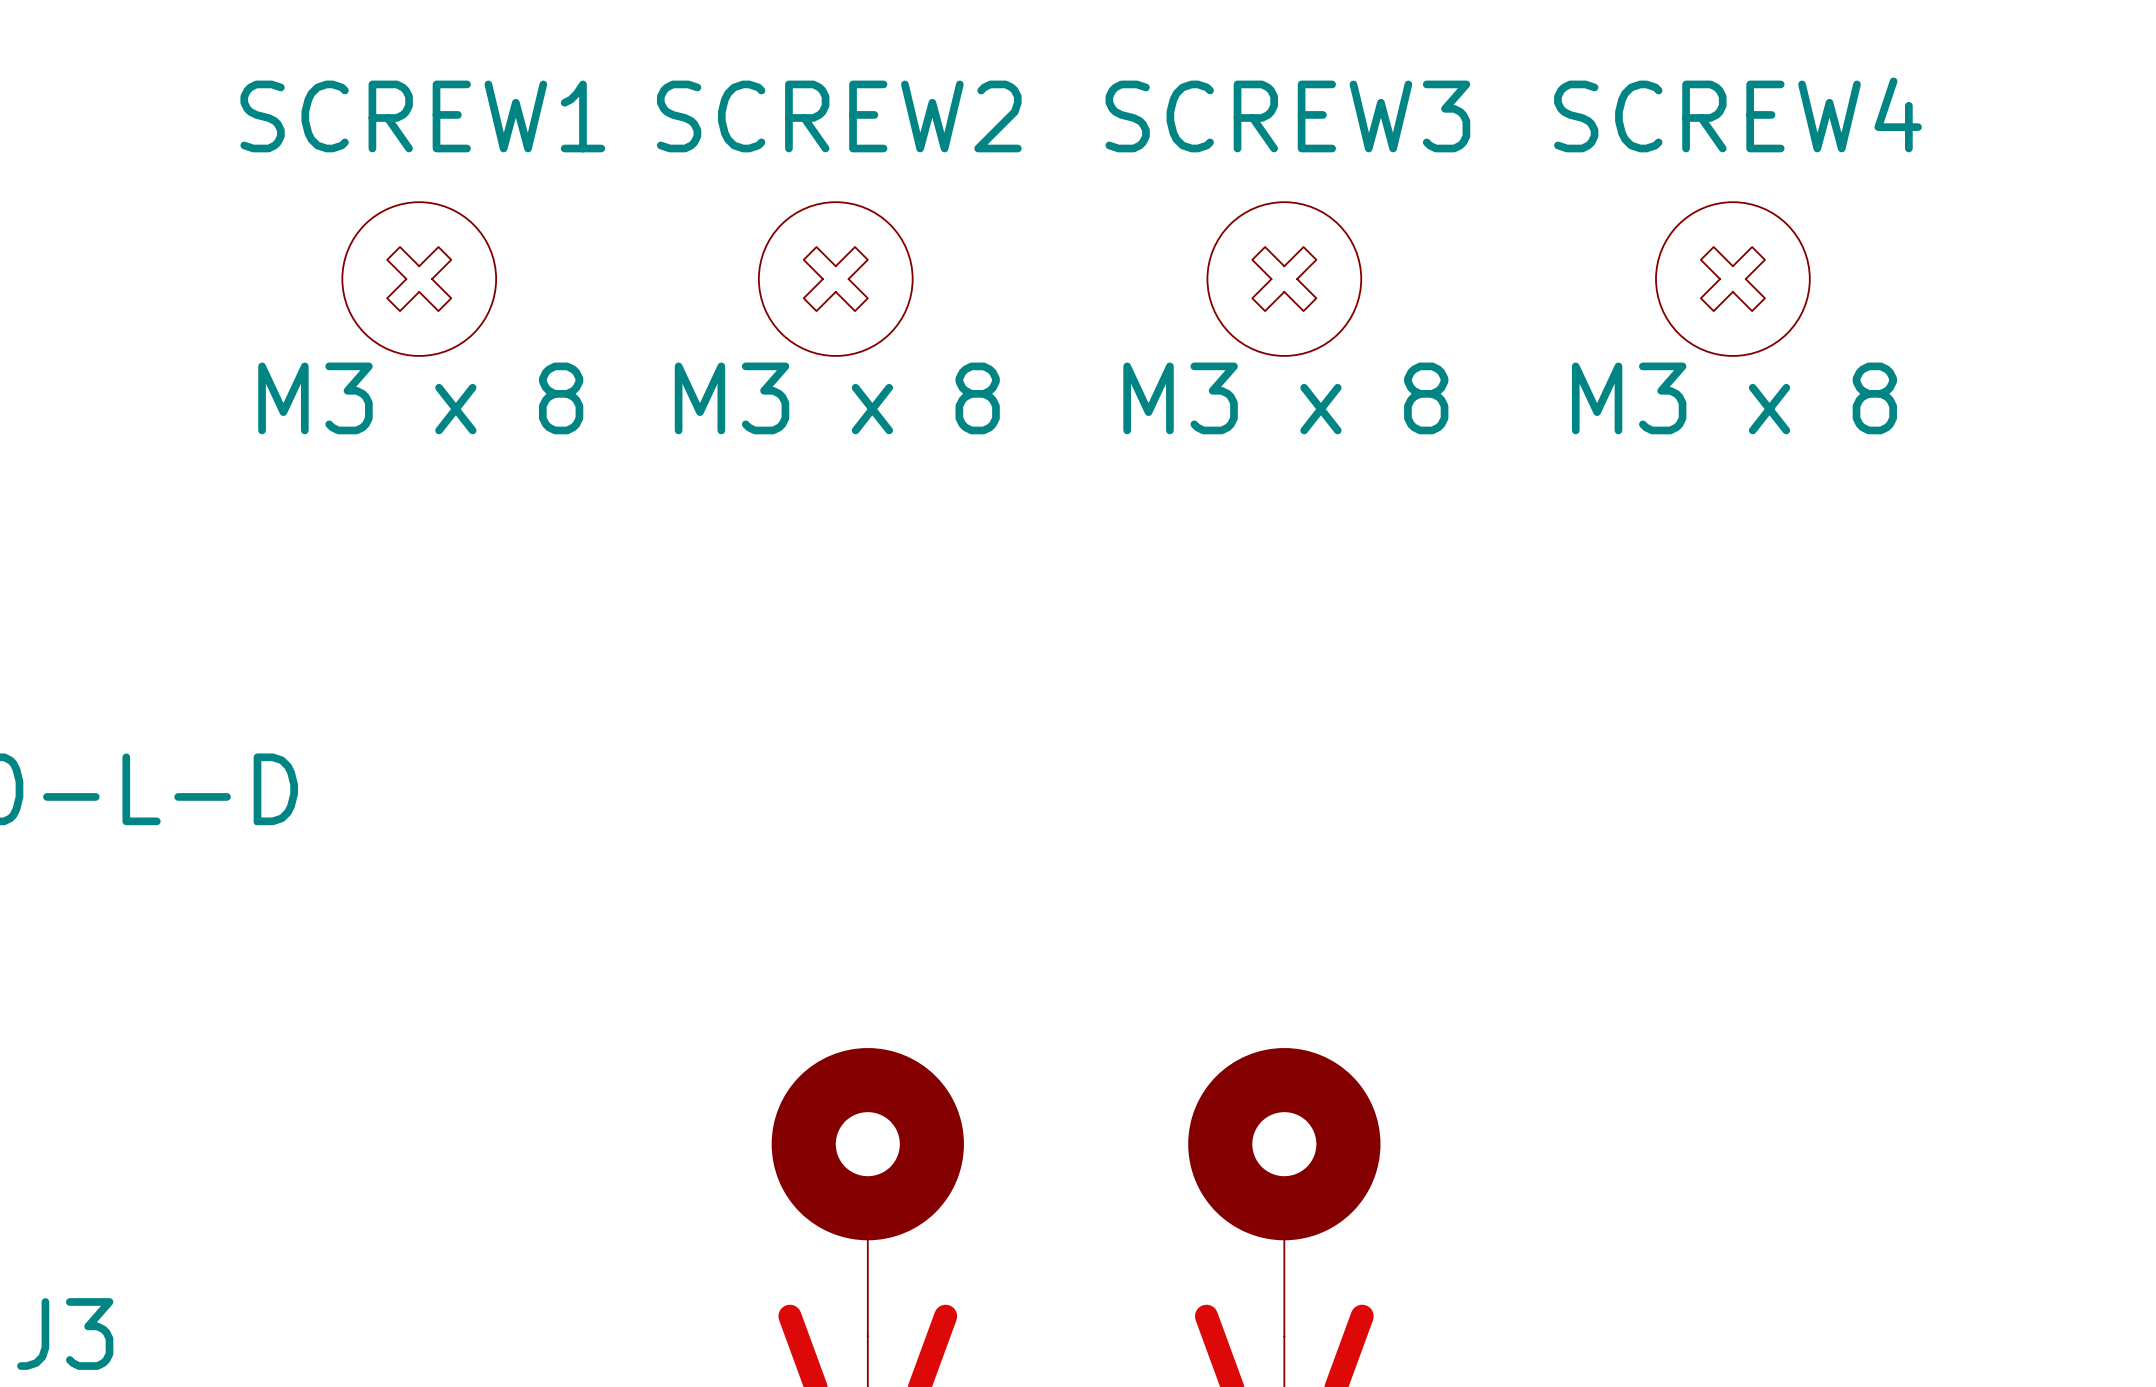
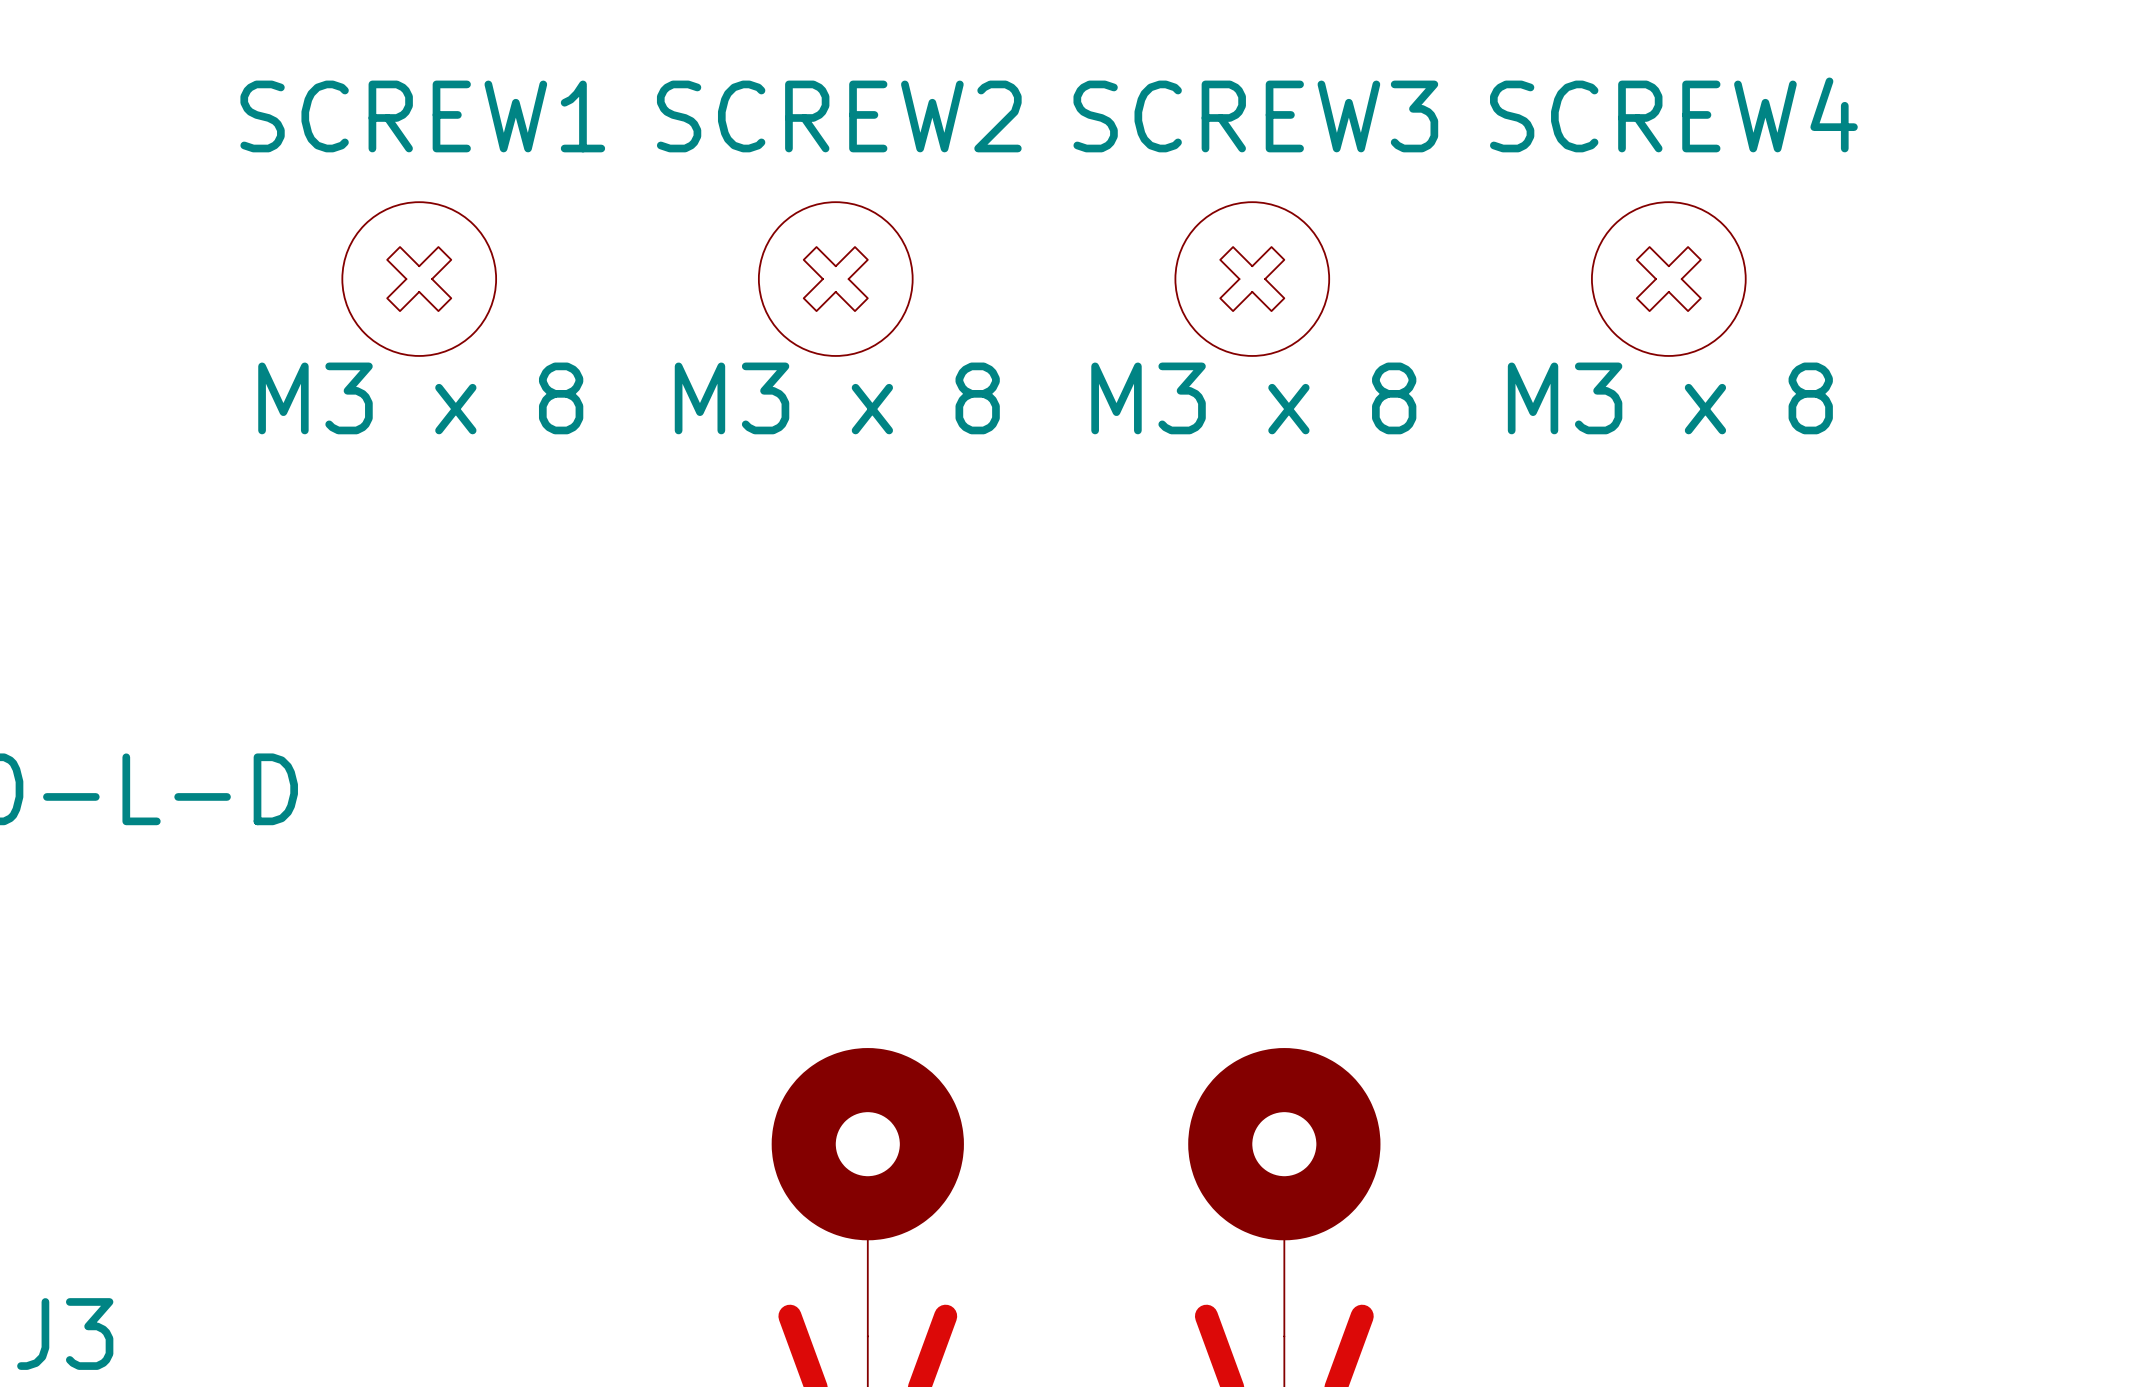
SCREW3 position: (1284, 279) -> (1252, 279)
SCREW4 position: (1732, 279) -> (1668, 279)

